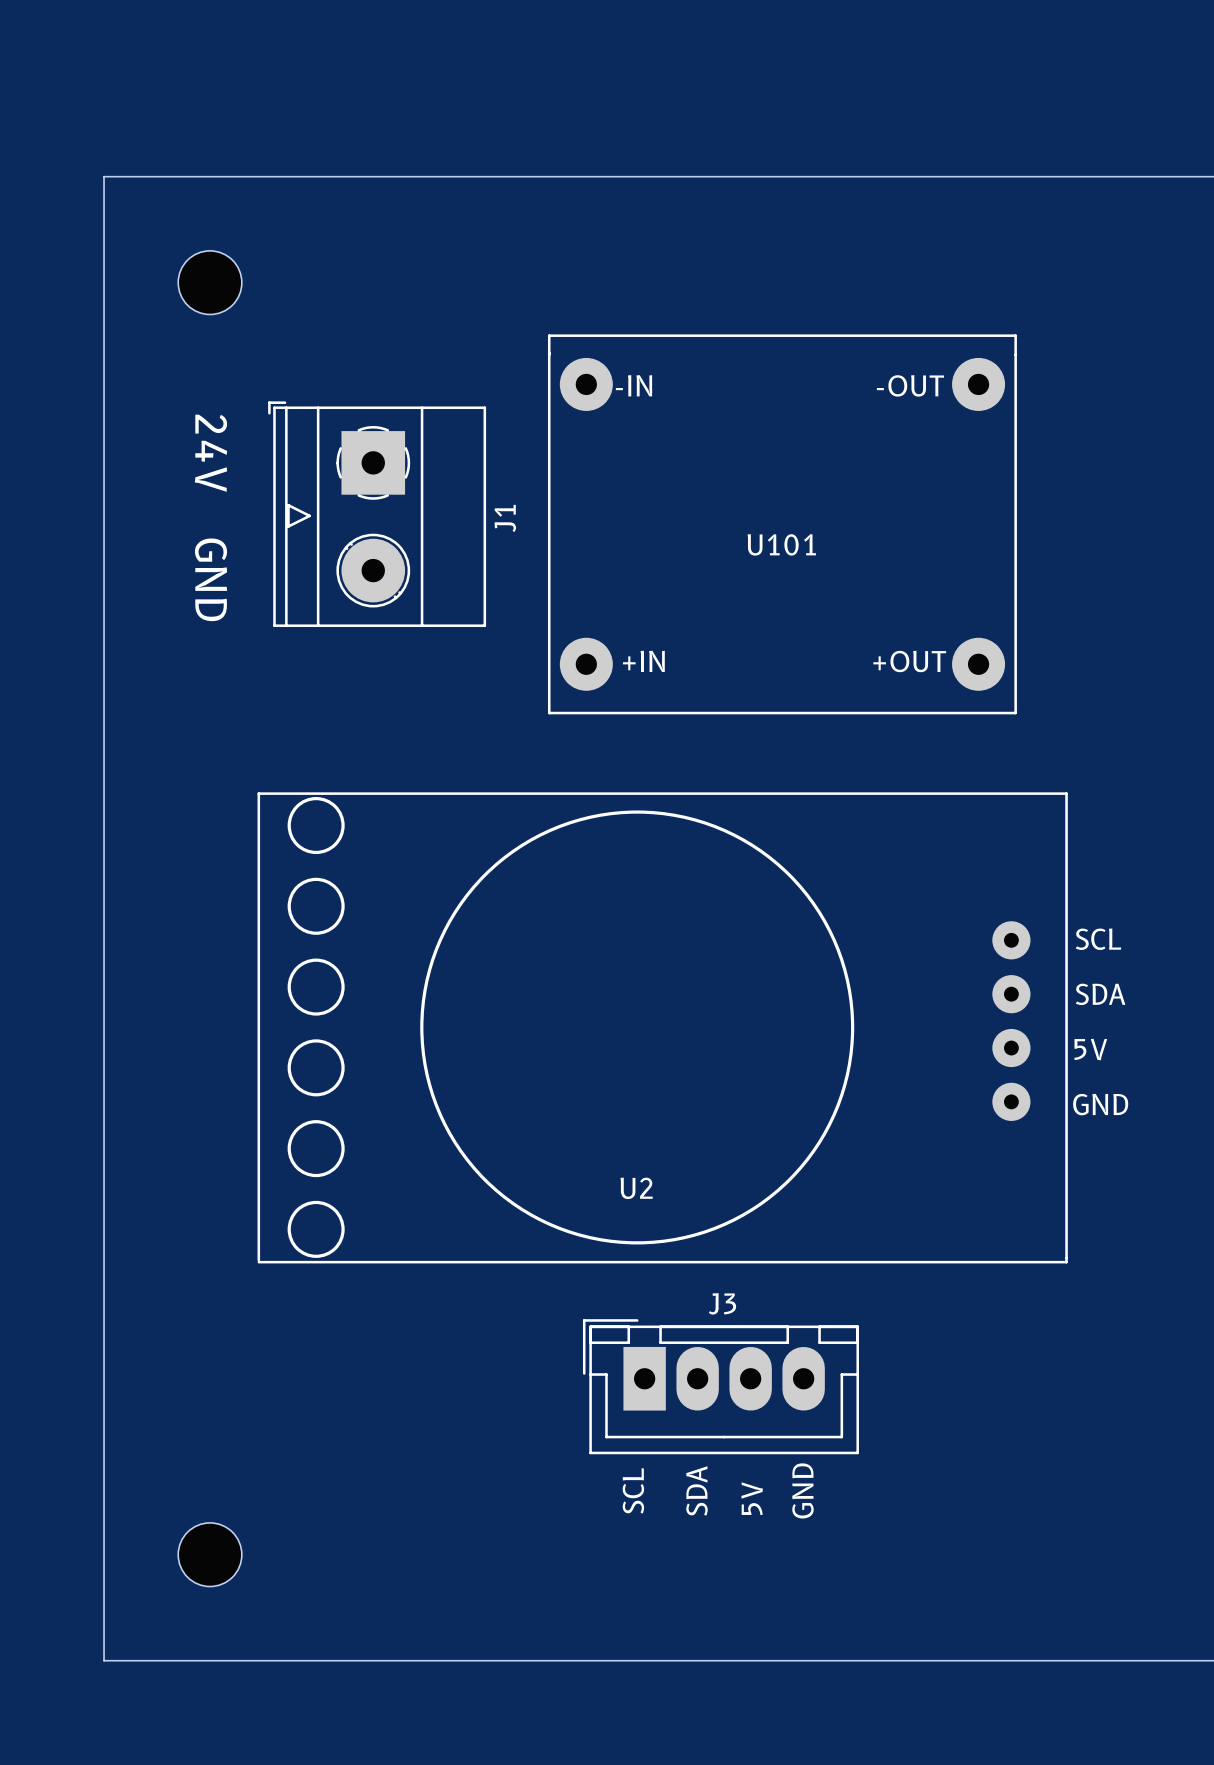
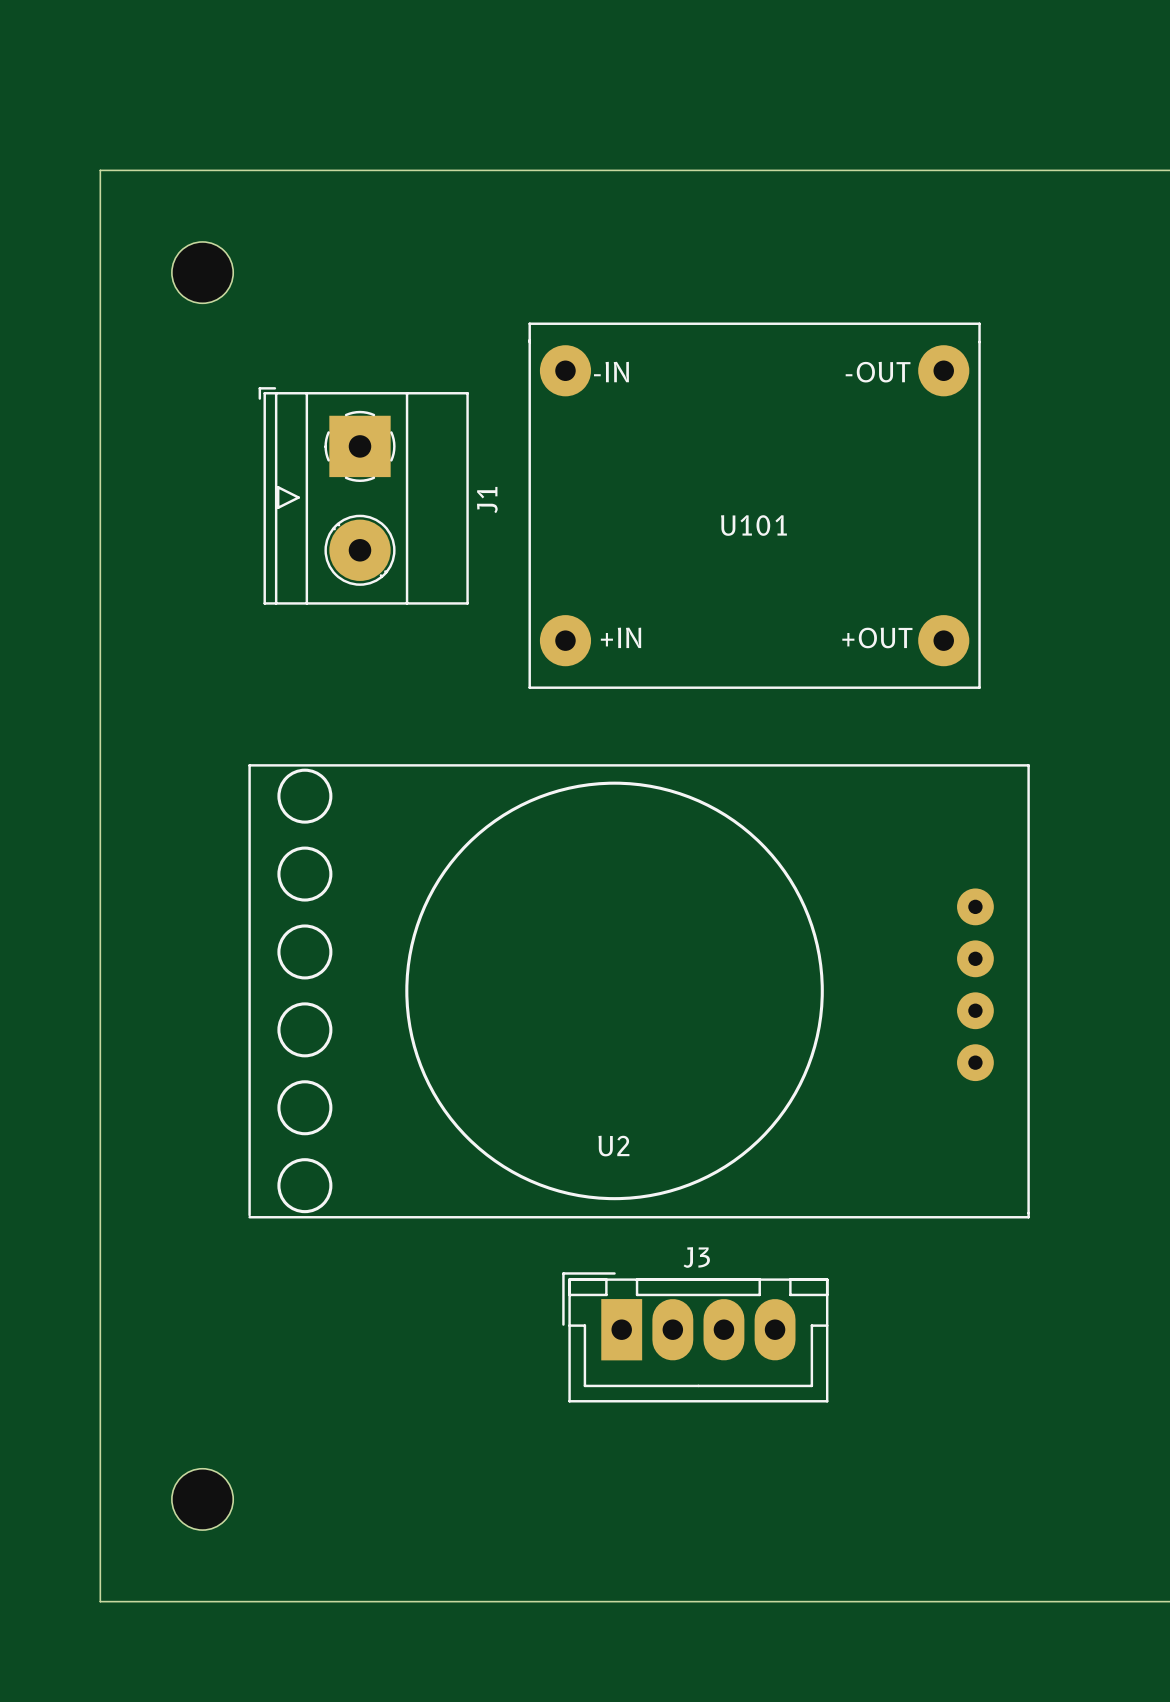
text: 24V (211, 453) -> none
text: GND (211, 579) -> none
text: SCL (1098, 939) -> none
text: SDA (1100, 994) -> none
text: 5V (1090, 1049) -> none
text: GND (1100, 1104) -> none
text: SCL (633, 1490) -> none
text: GND (802, 1490) -> none
text: SDA (696, 1491) -> none
text: 5V (752, 1498) -> none

